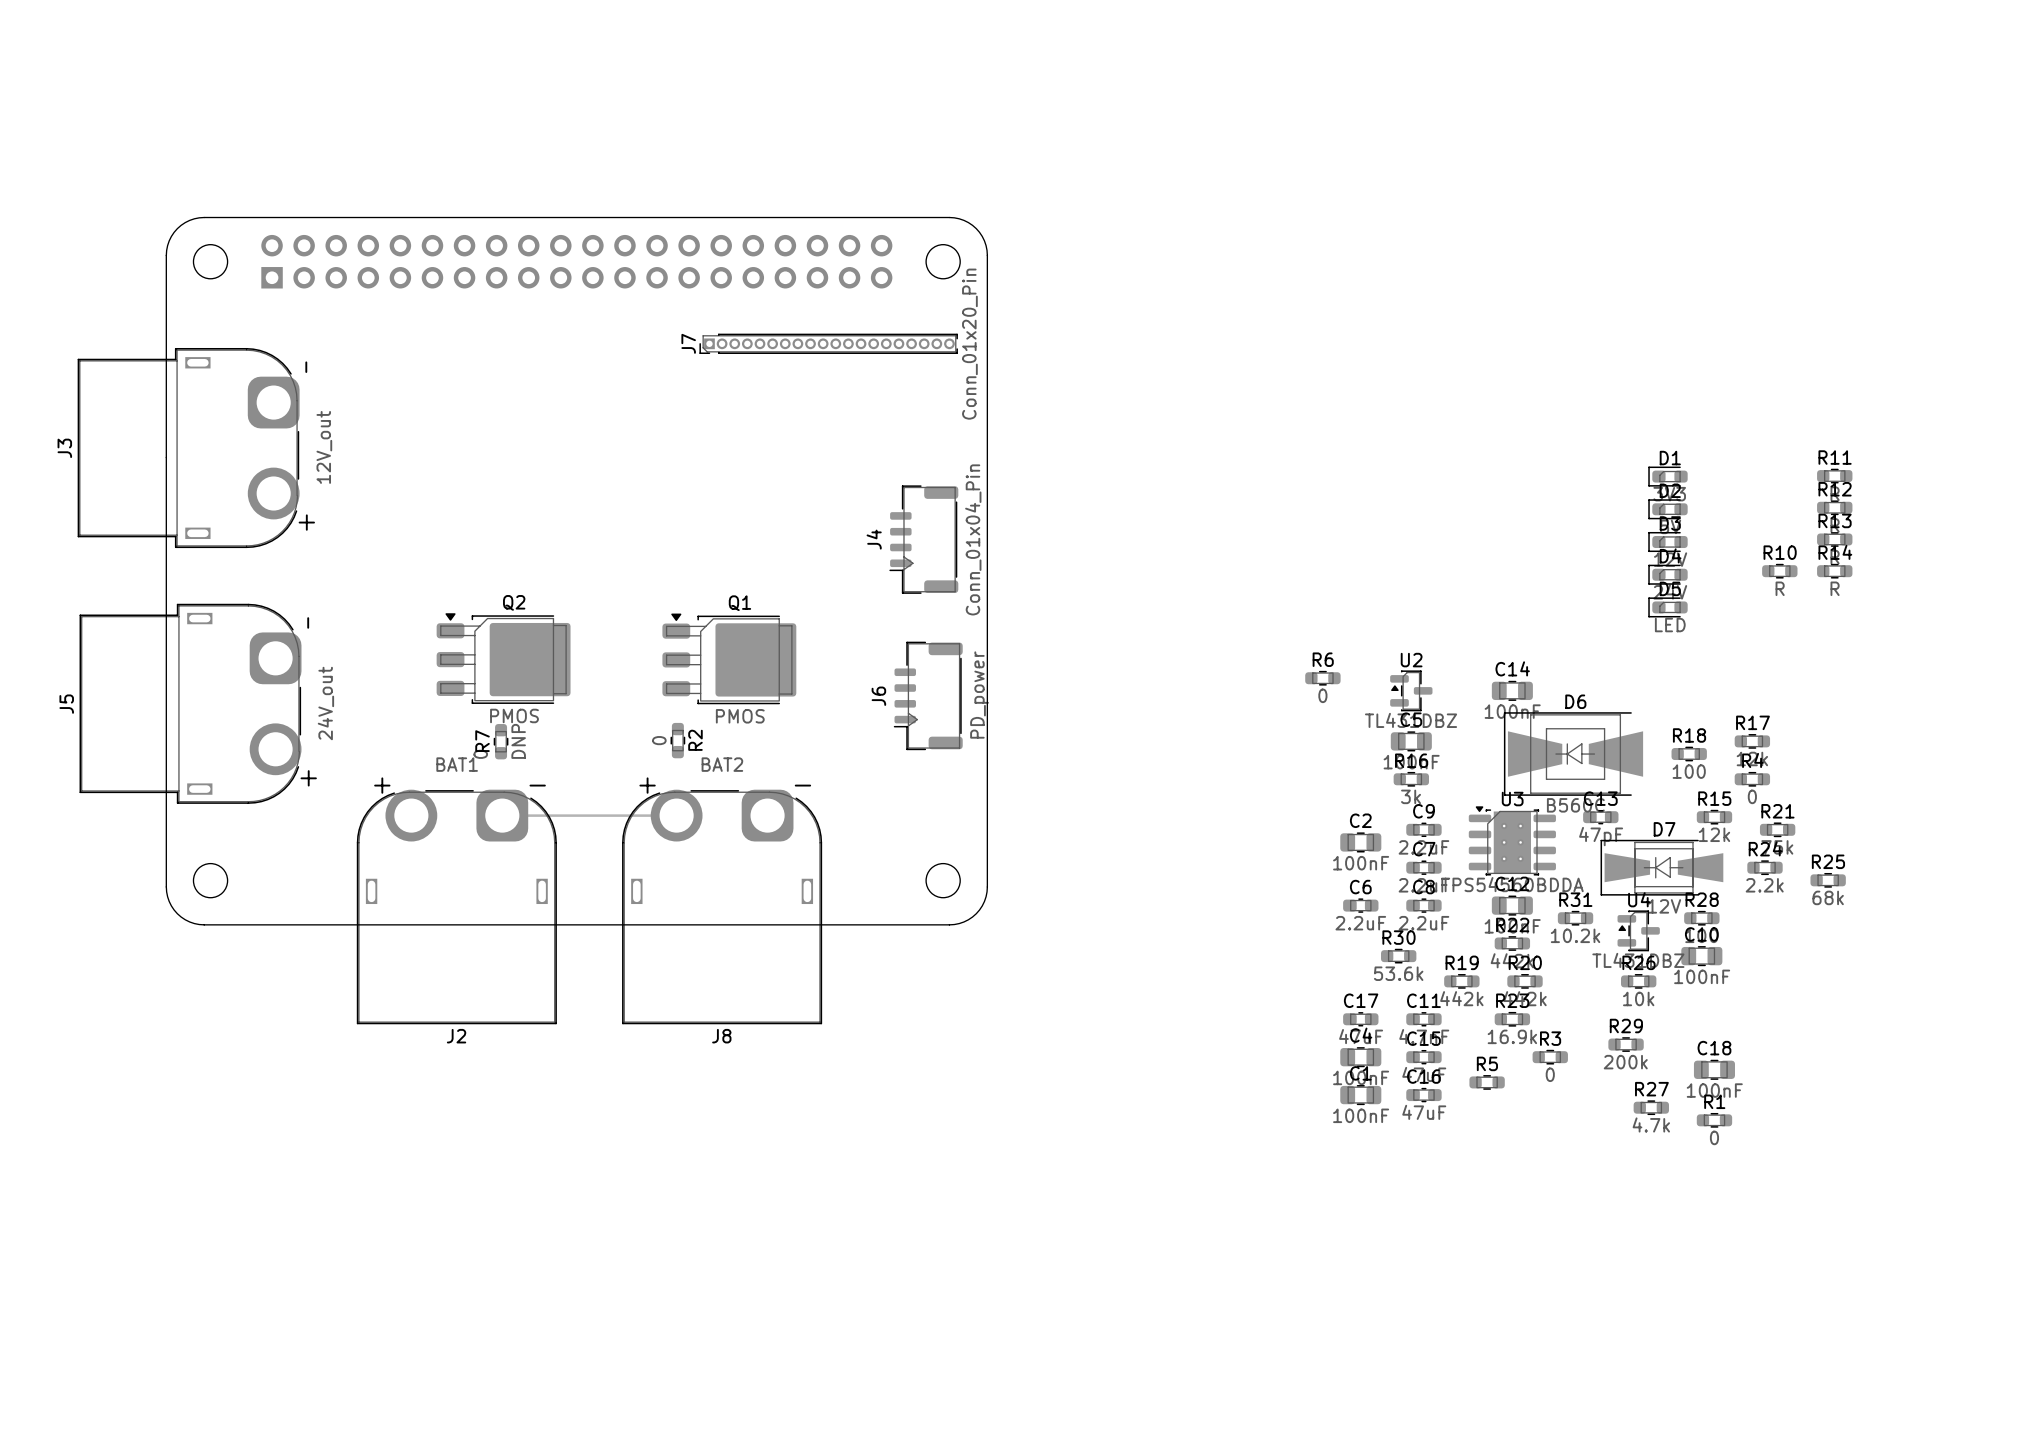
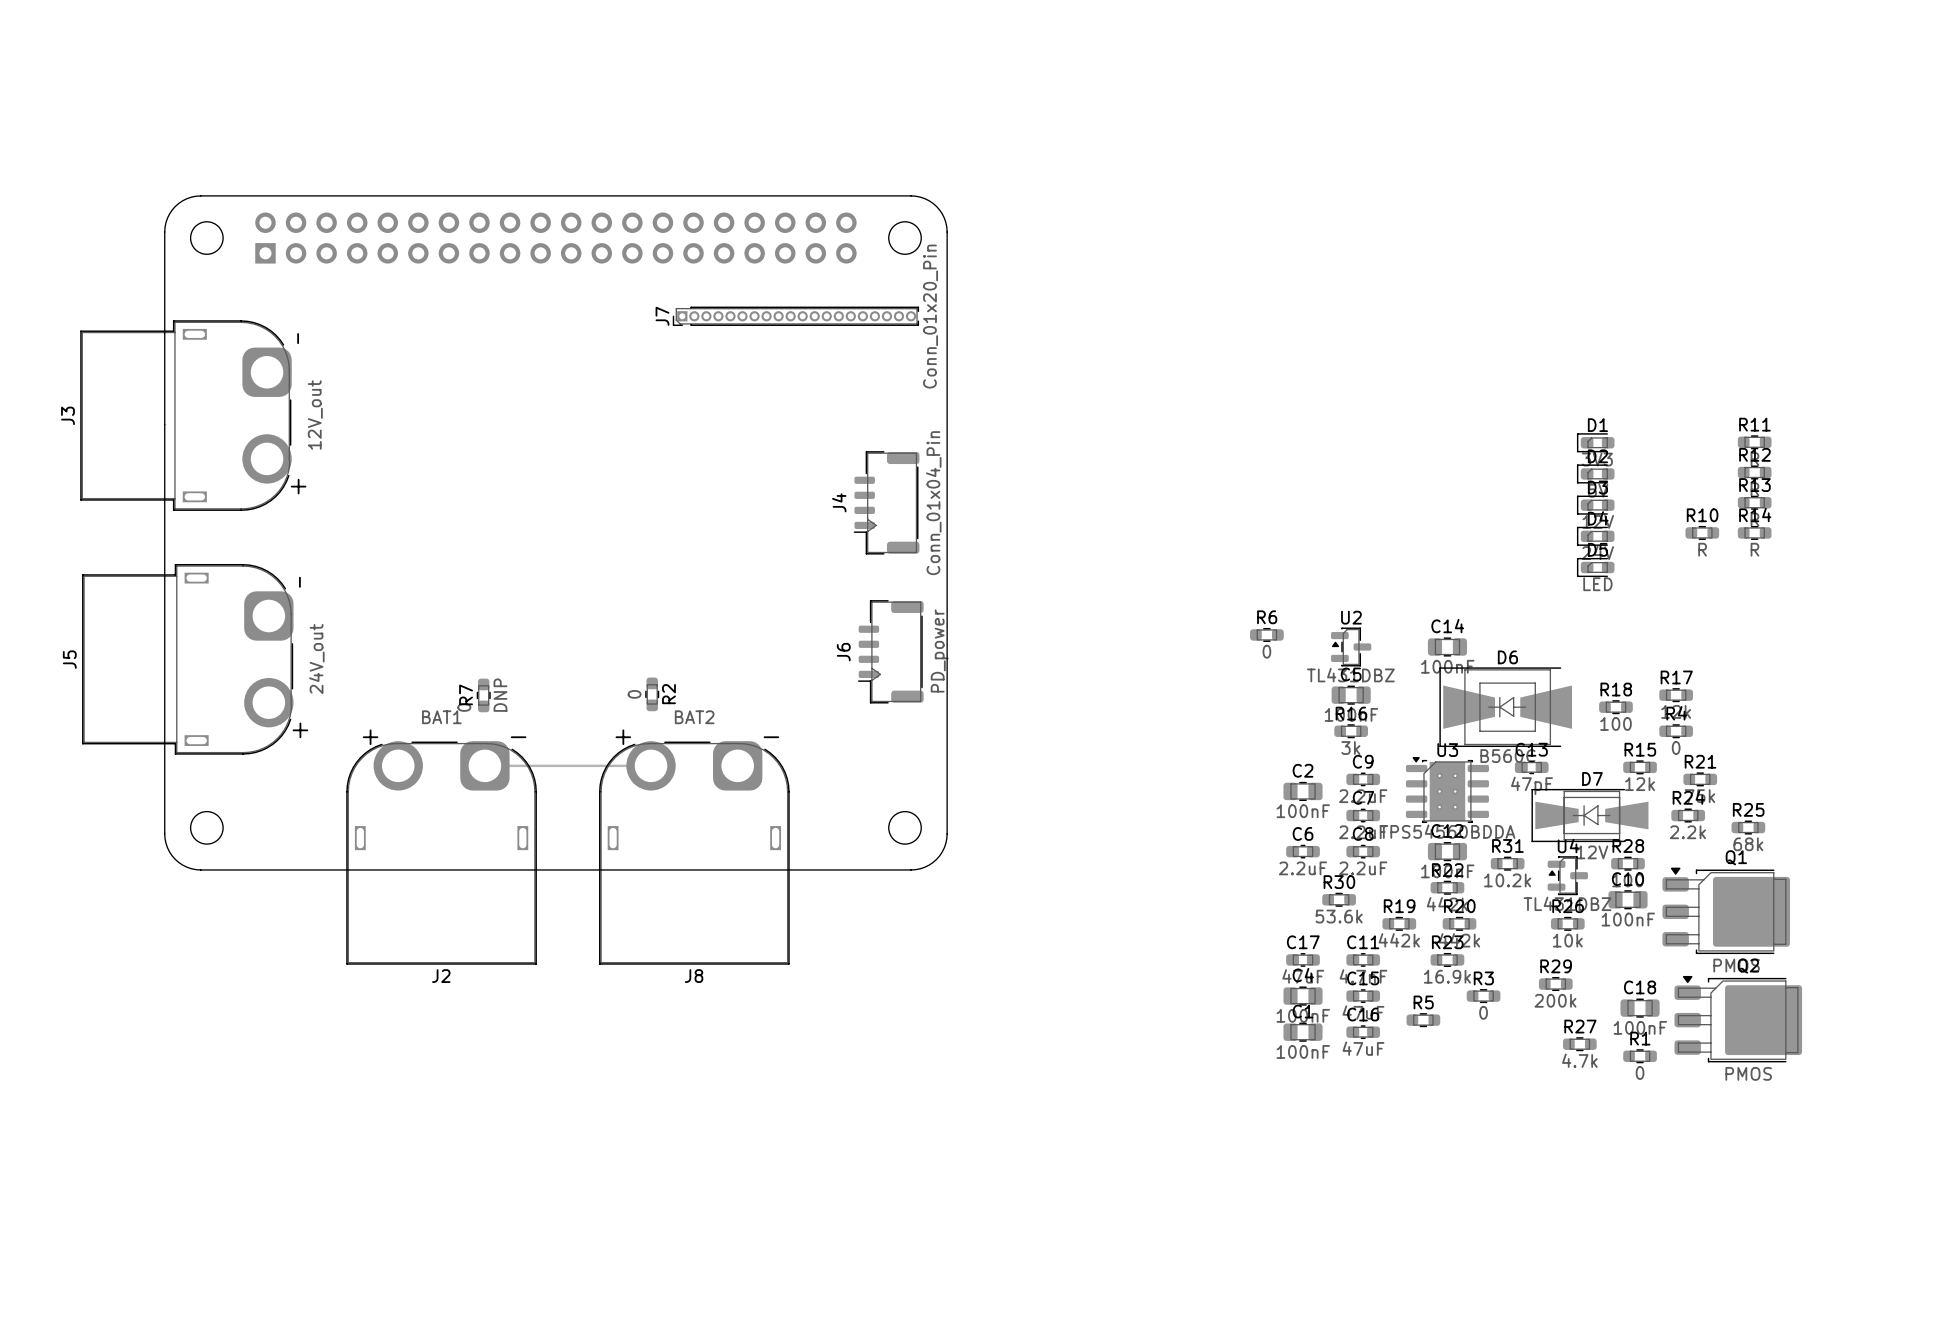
Q2 position: (503, 658) -> (1738, 1019)
Q1 position: (729, 658) -> (1726, 910)

